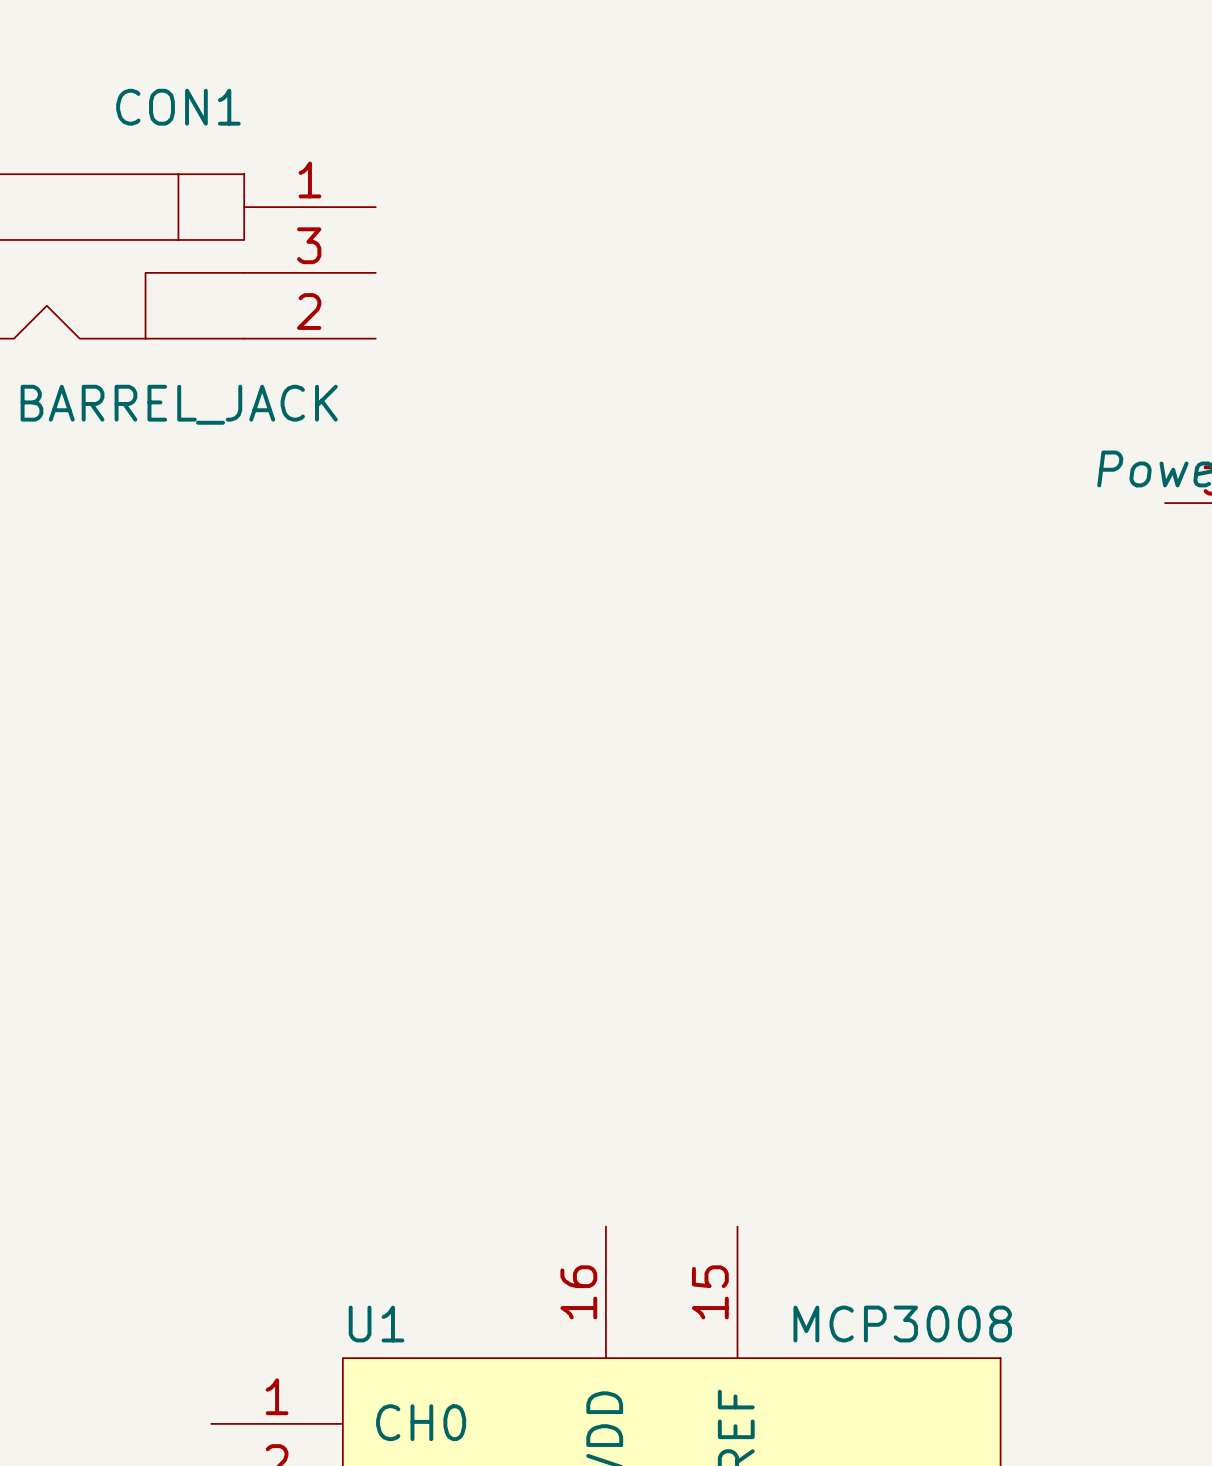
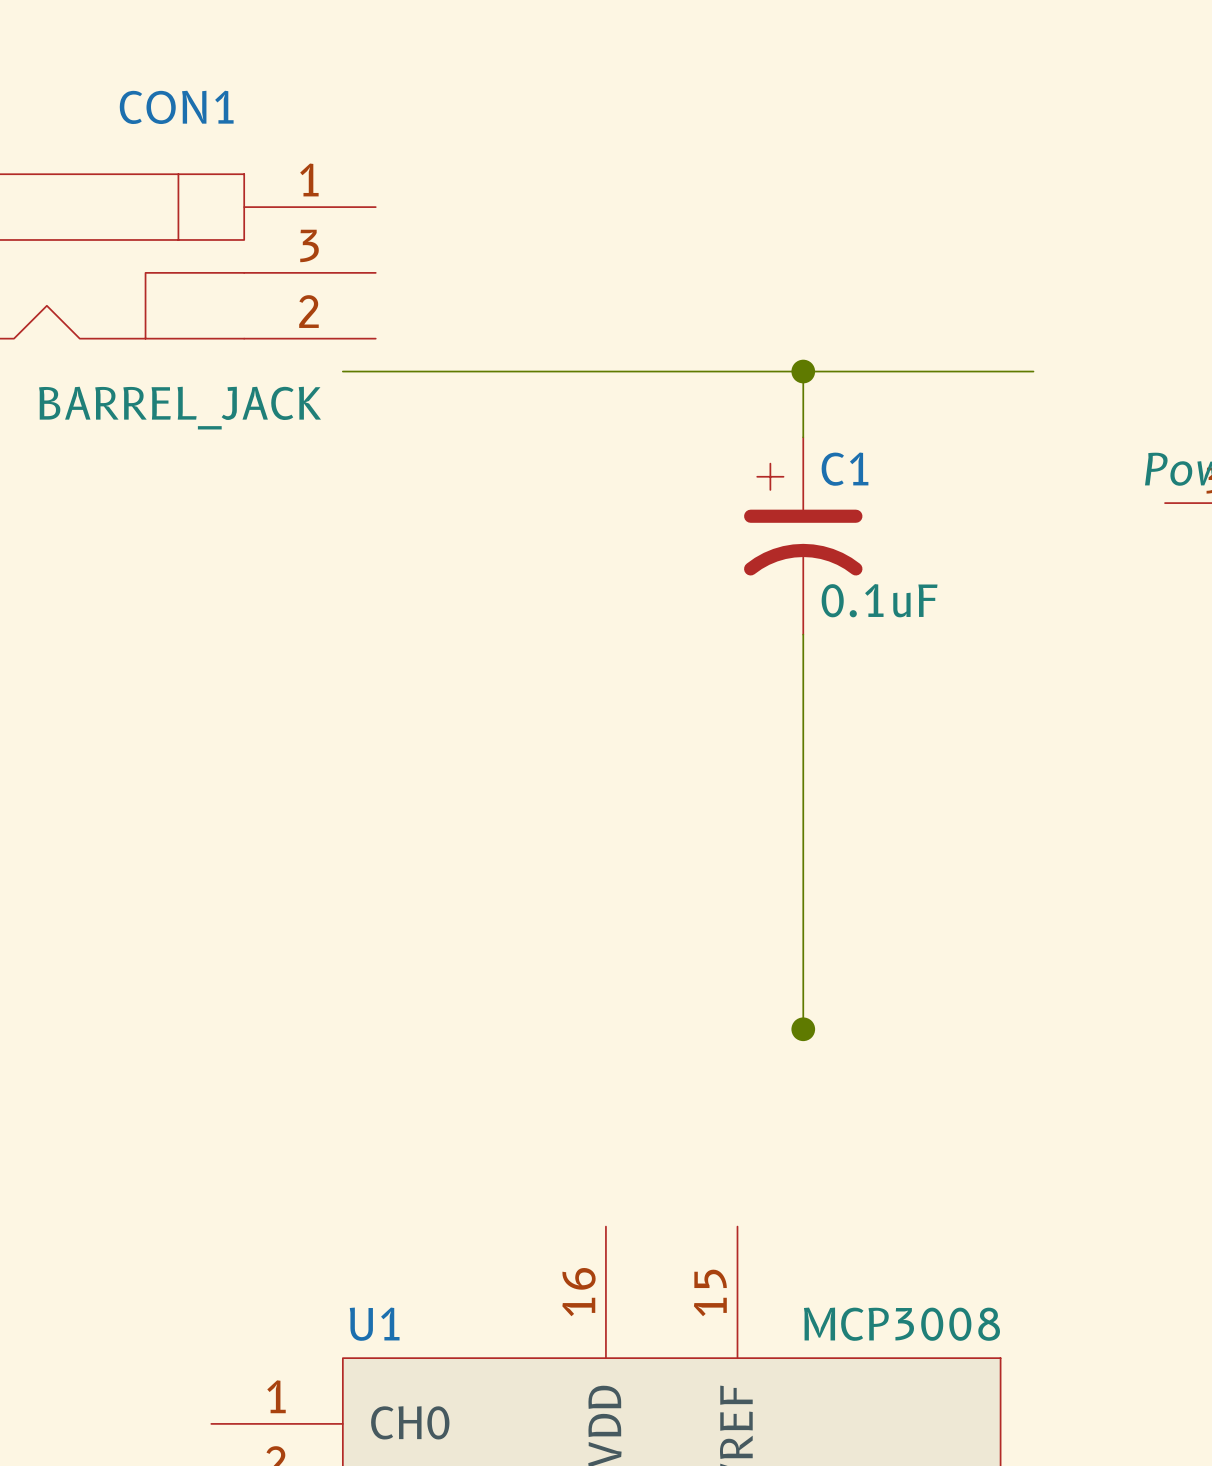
wire: none -> (342, 371) (1033, 371)
wire: none -> (803, 371) (803, 437)
junction: none -> (803, 371)
C1: none -> 0.1uF (803, 535)
wire: none -> (803, 634) (803, 1029)
junction: none -> (803, 1029)

